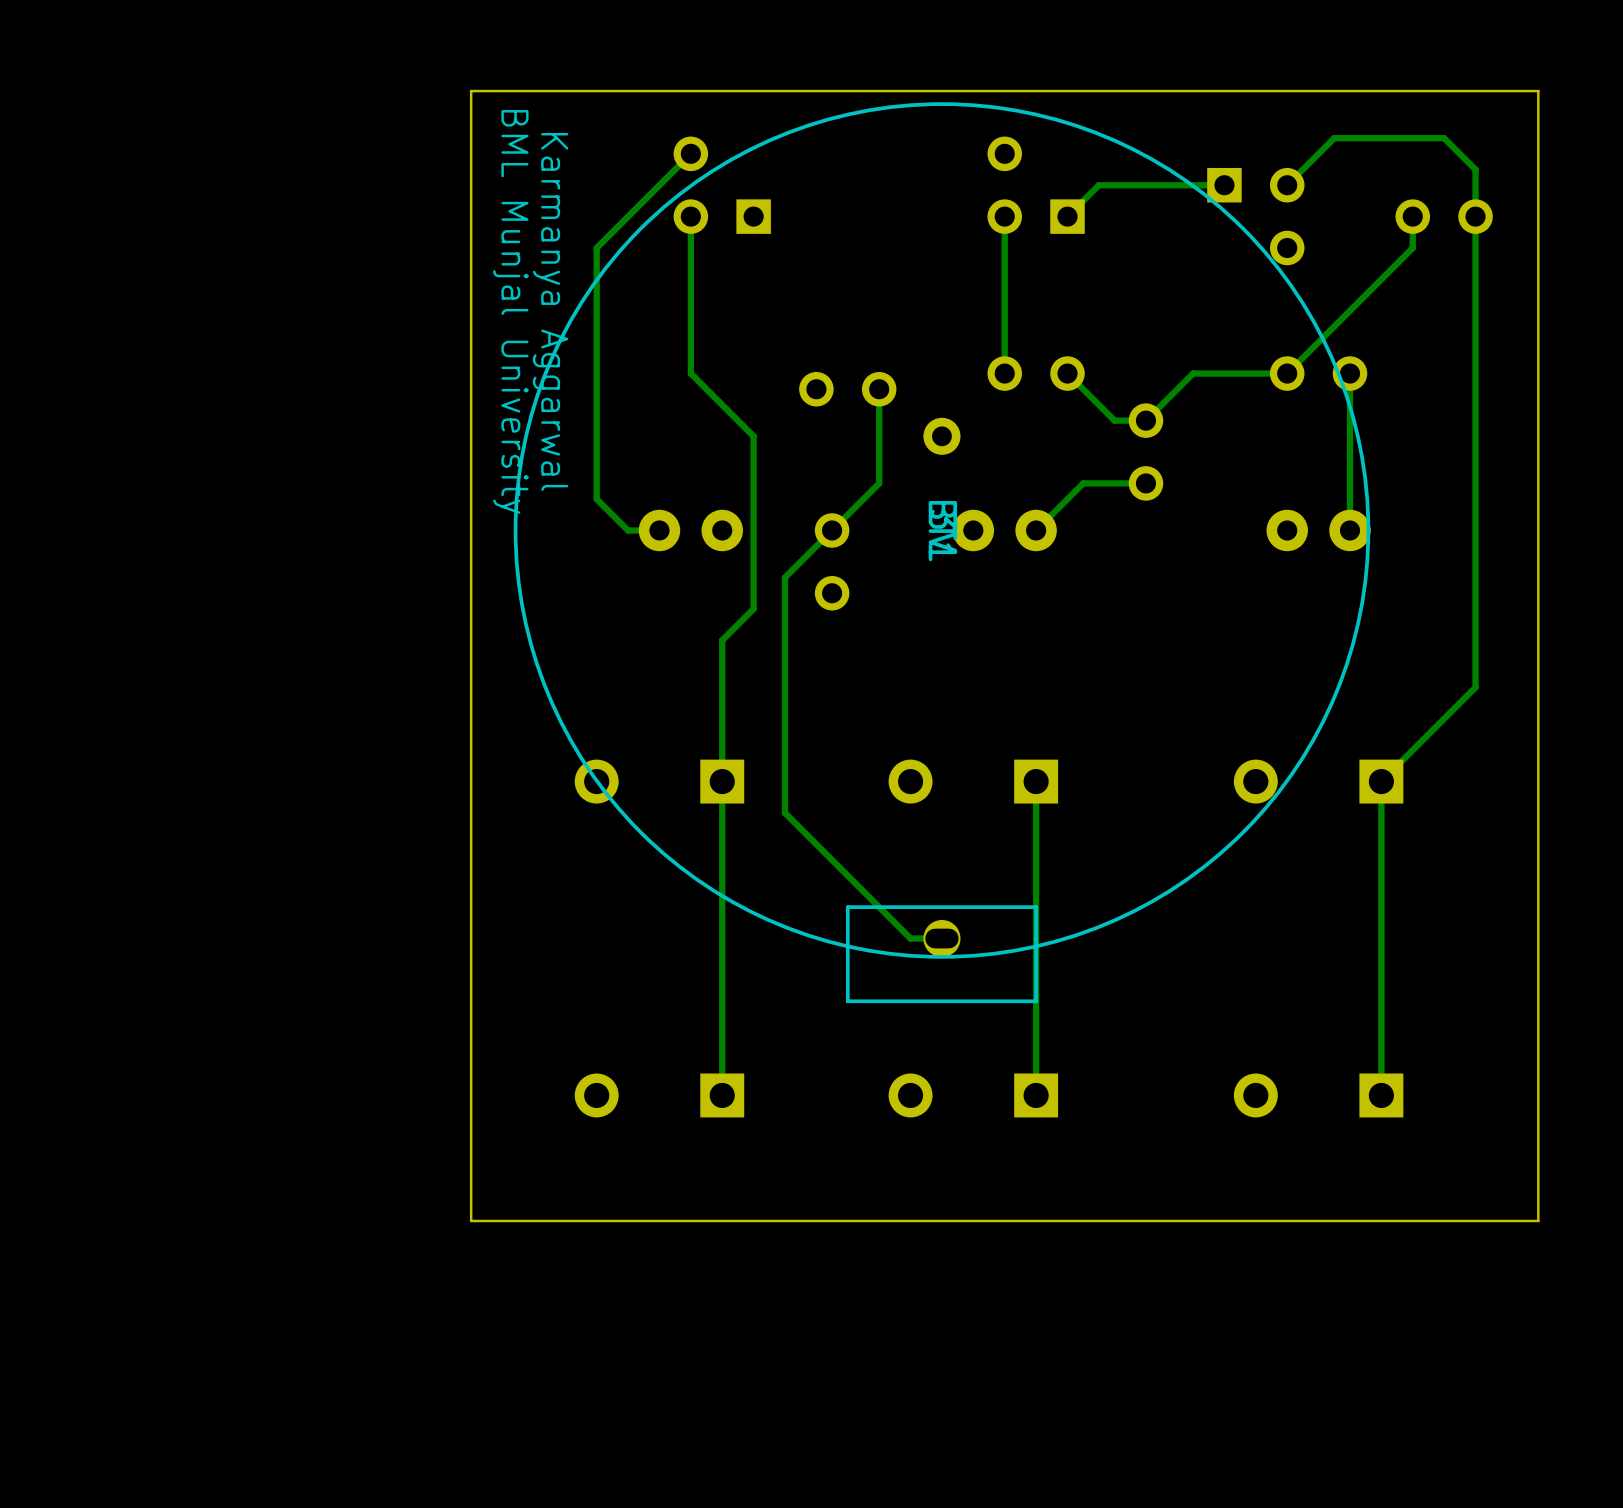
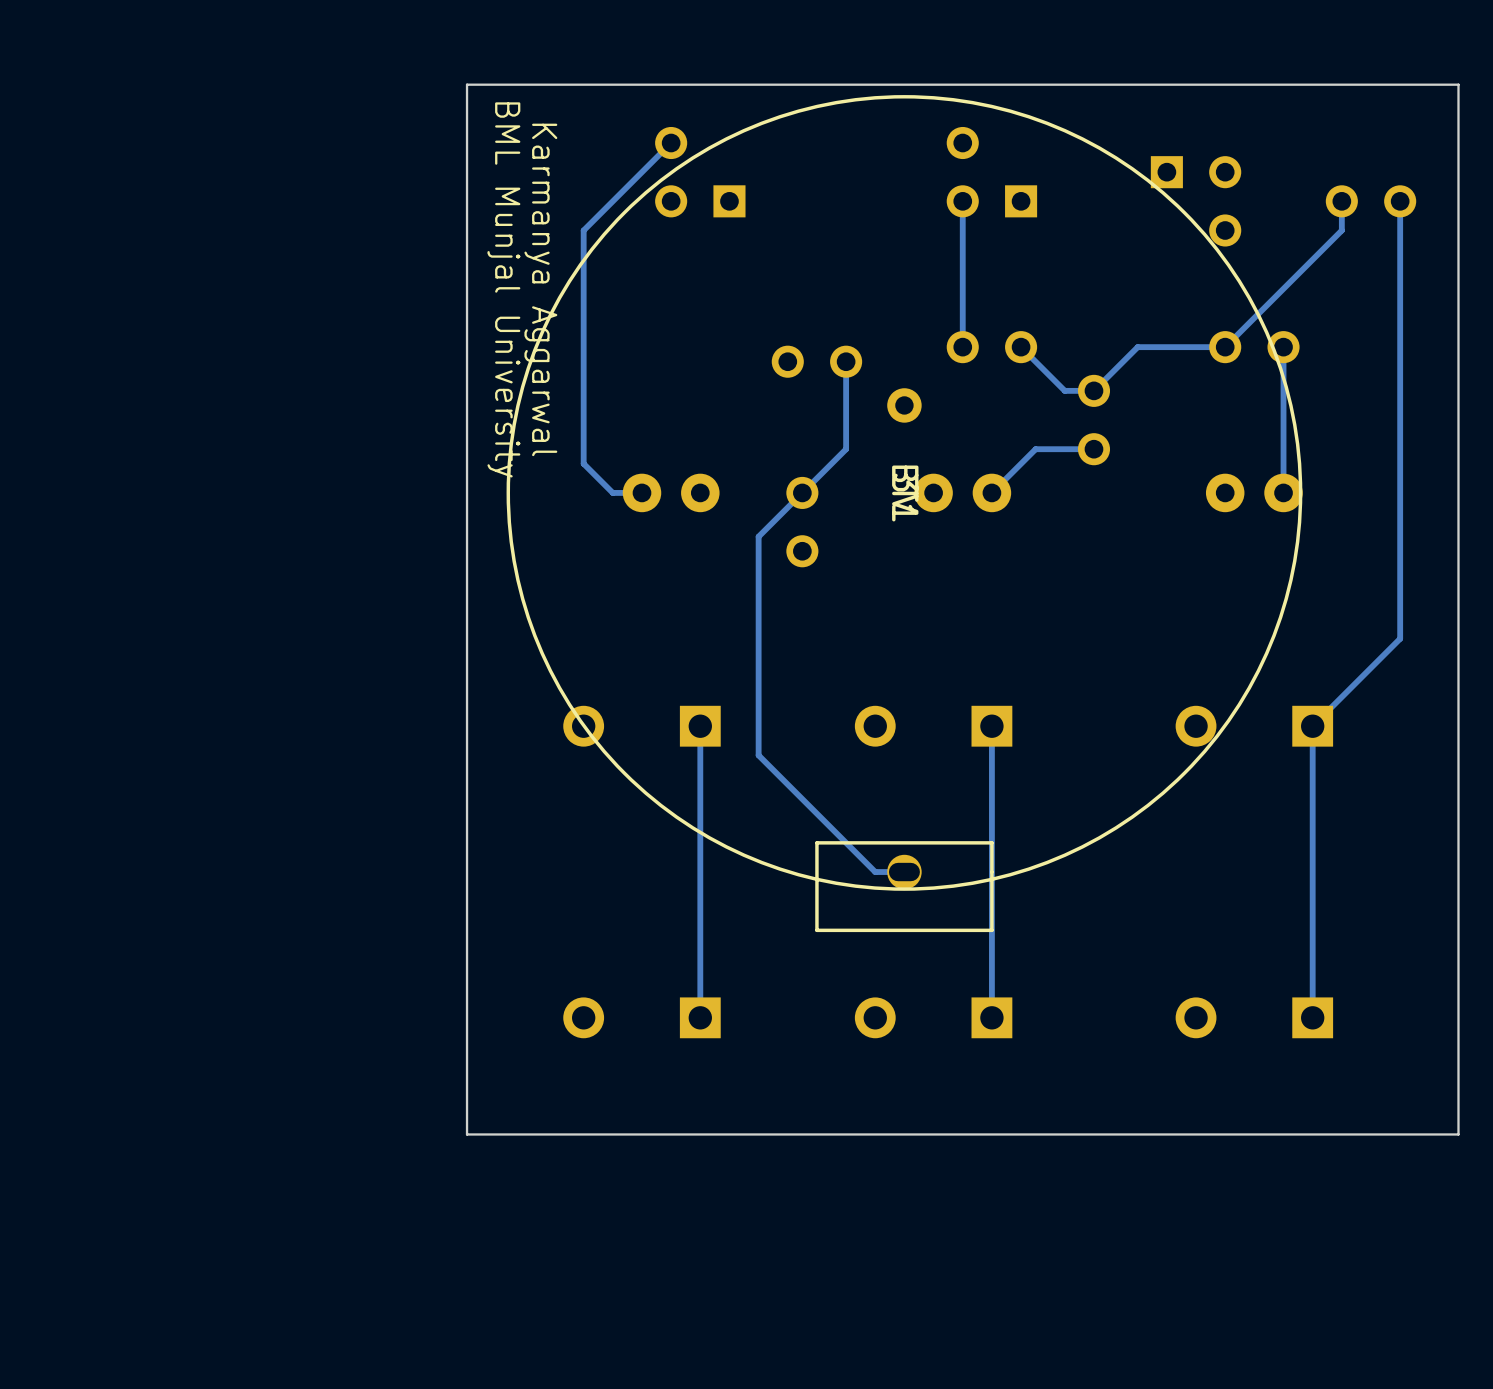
track: (1224, 185) (1098, 185) (1067, 216) -> none
track: (1287, 185) (1334, 138) (1444, 138) (1475, 169) (1475, 216) -> none
track: (690, 216) (690, 373) (753, 436) (753, 608) (722, 640) (722, 781) -> none

